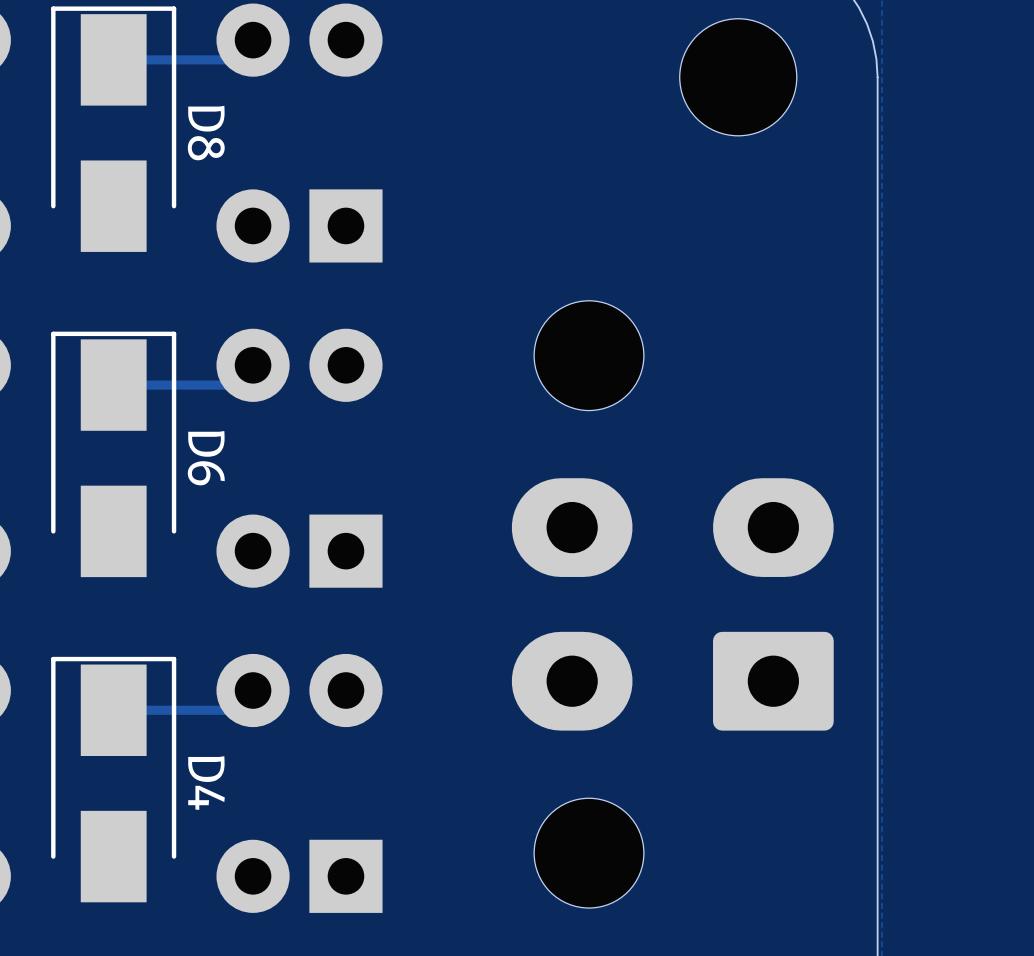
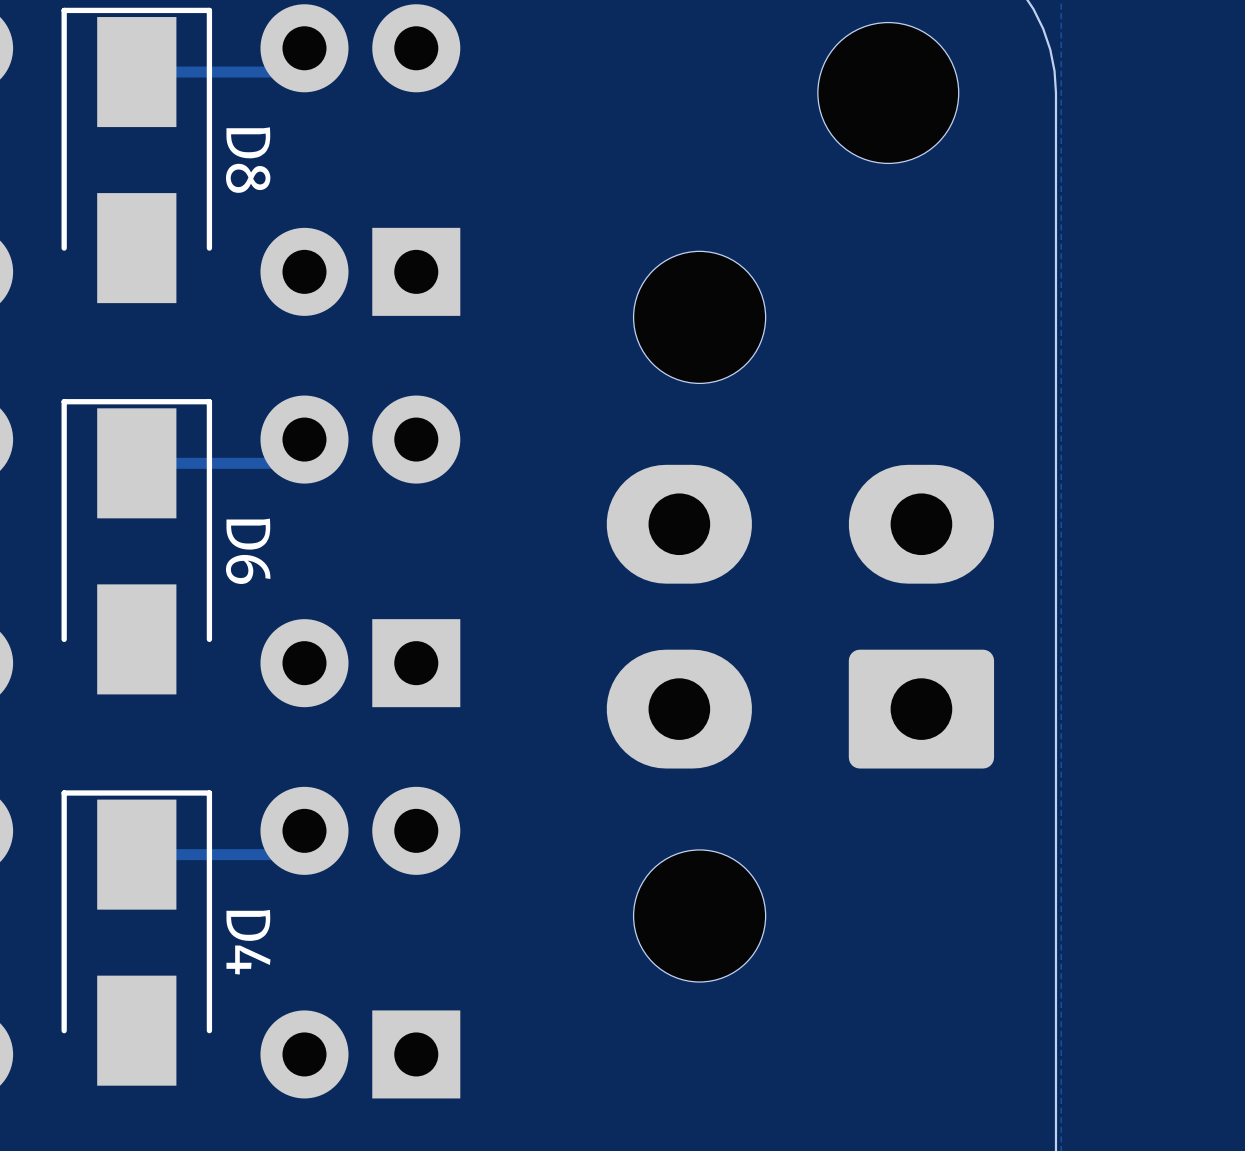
part position: (672, 604) -> (800, 616)

